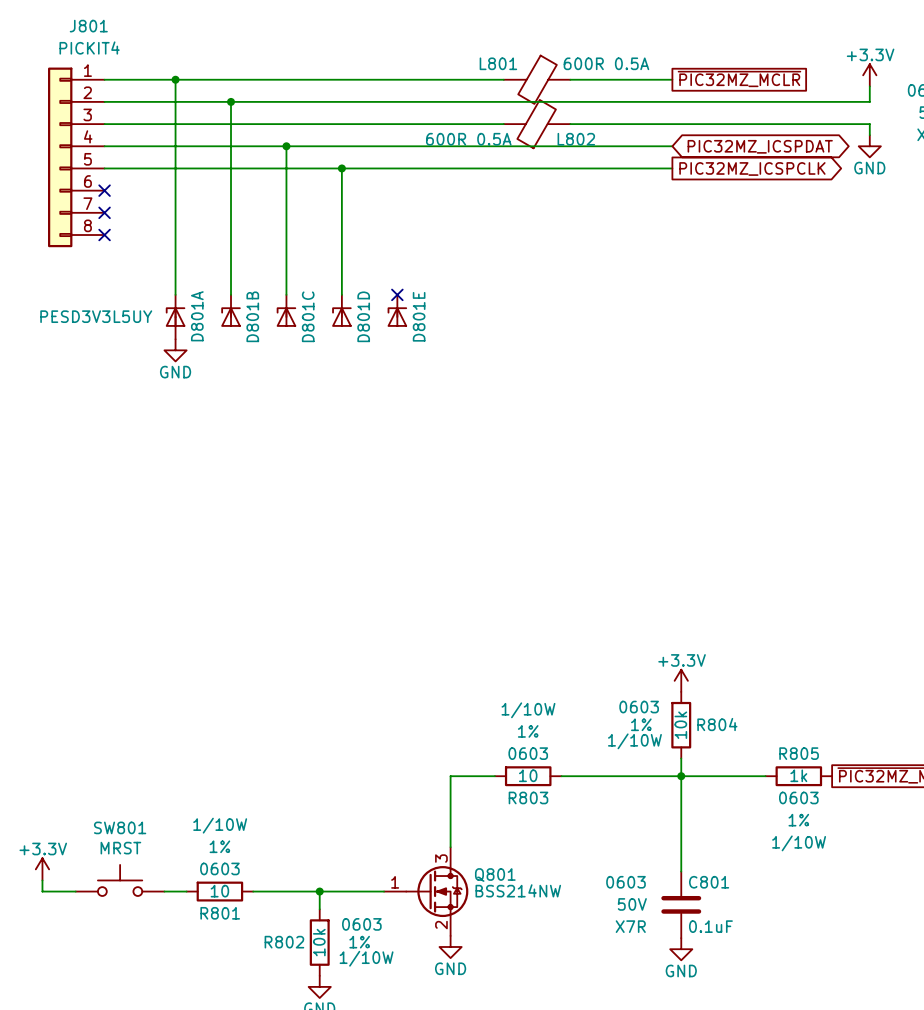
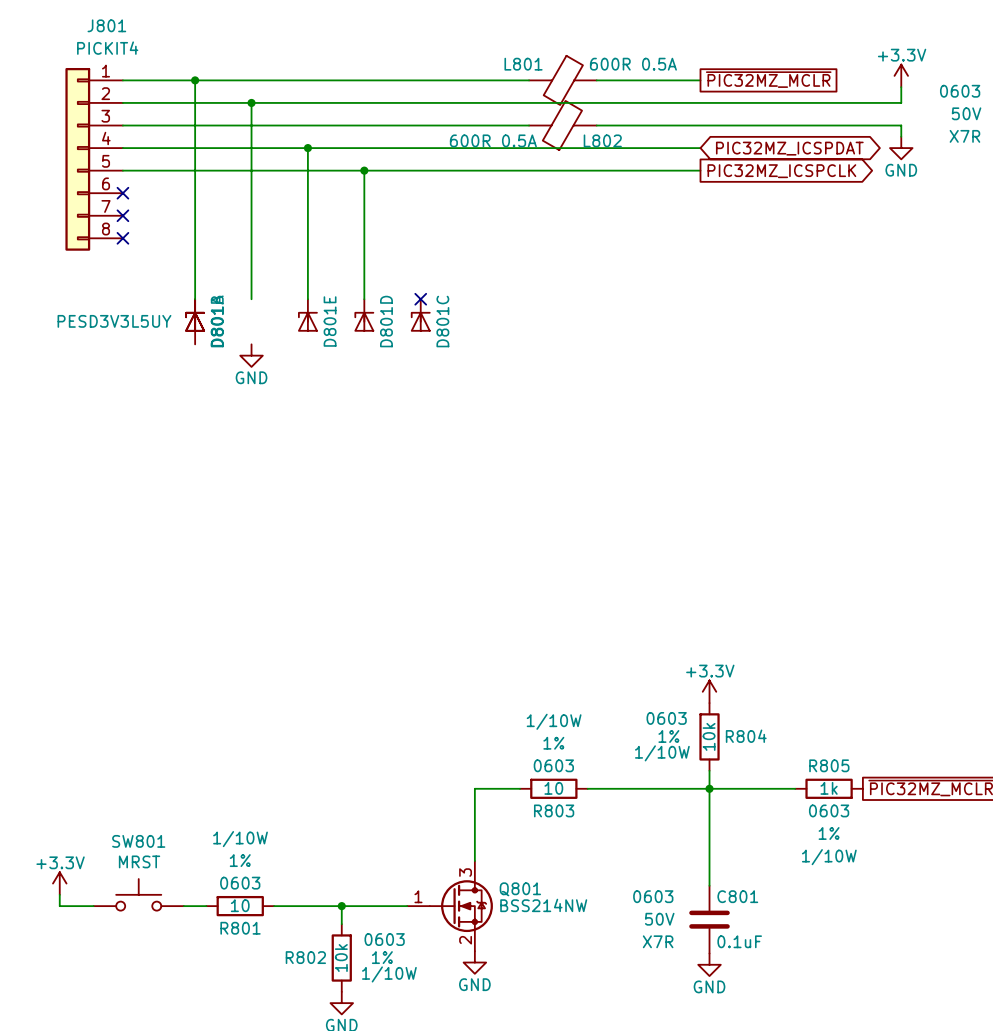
D801B position: (231, 310) -> (195, 315)
D801C name: D801C (308, 316) -> D801E (330, 321)
D801E name: D801E (419, 316) -> D801C (442, 321)
power symbol position: GND (175, 350) -> GND (251, 355)

